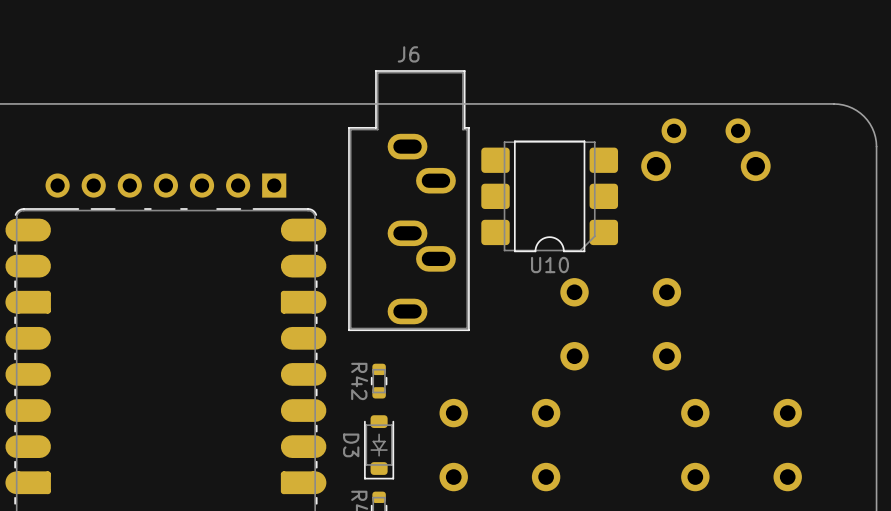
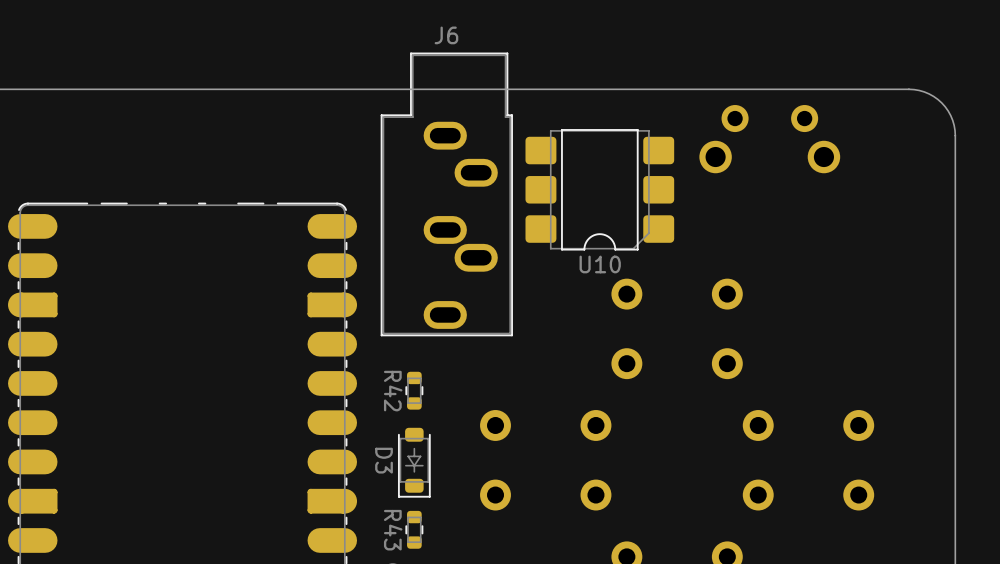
part: (165, 185) -> none

